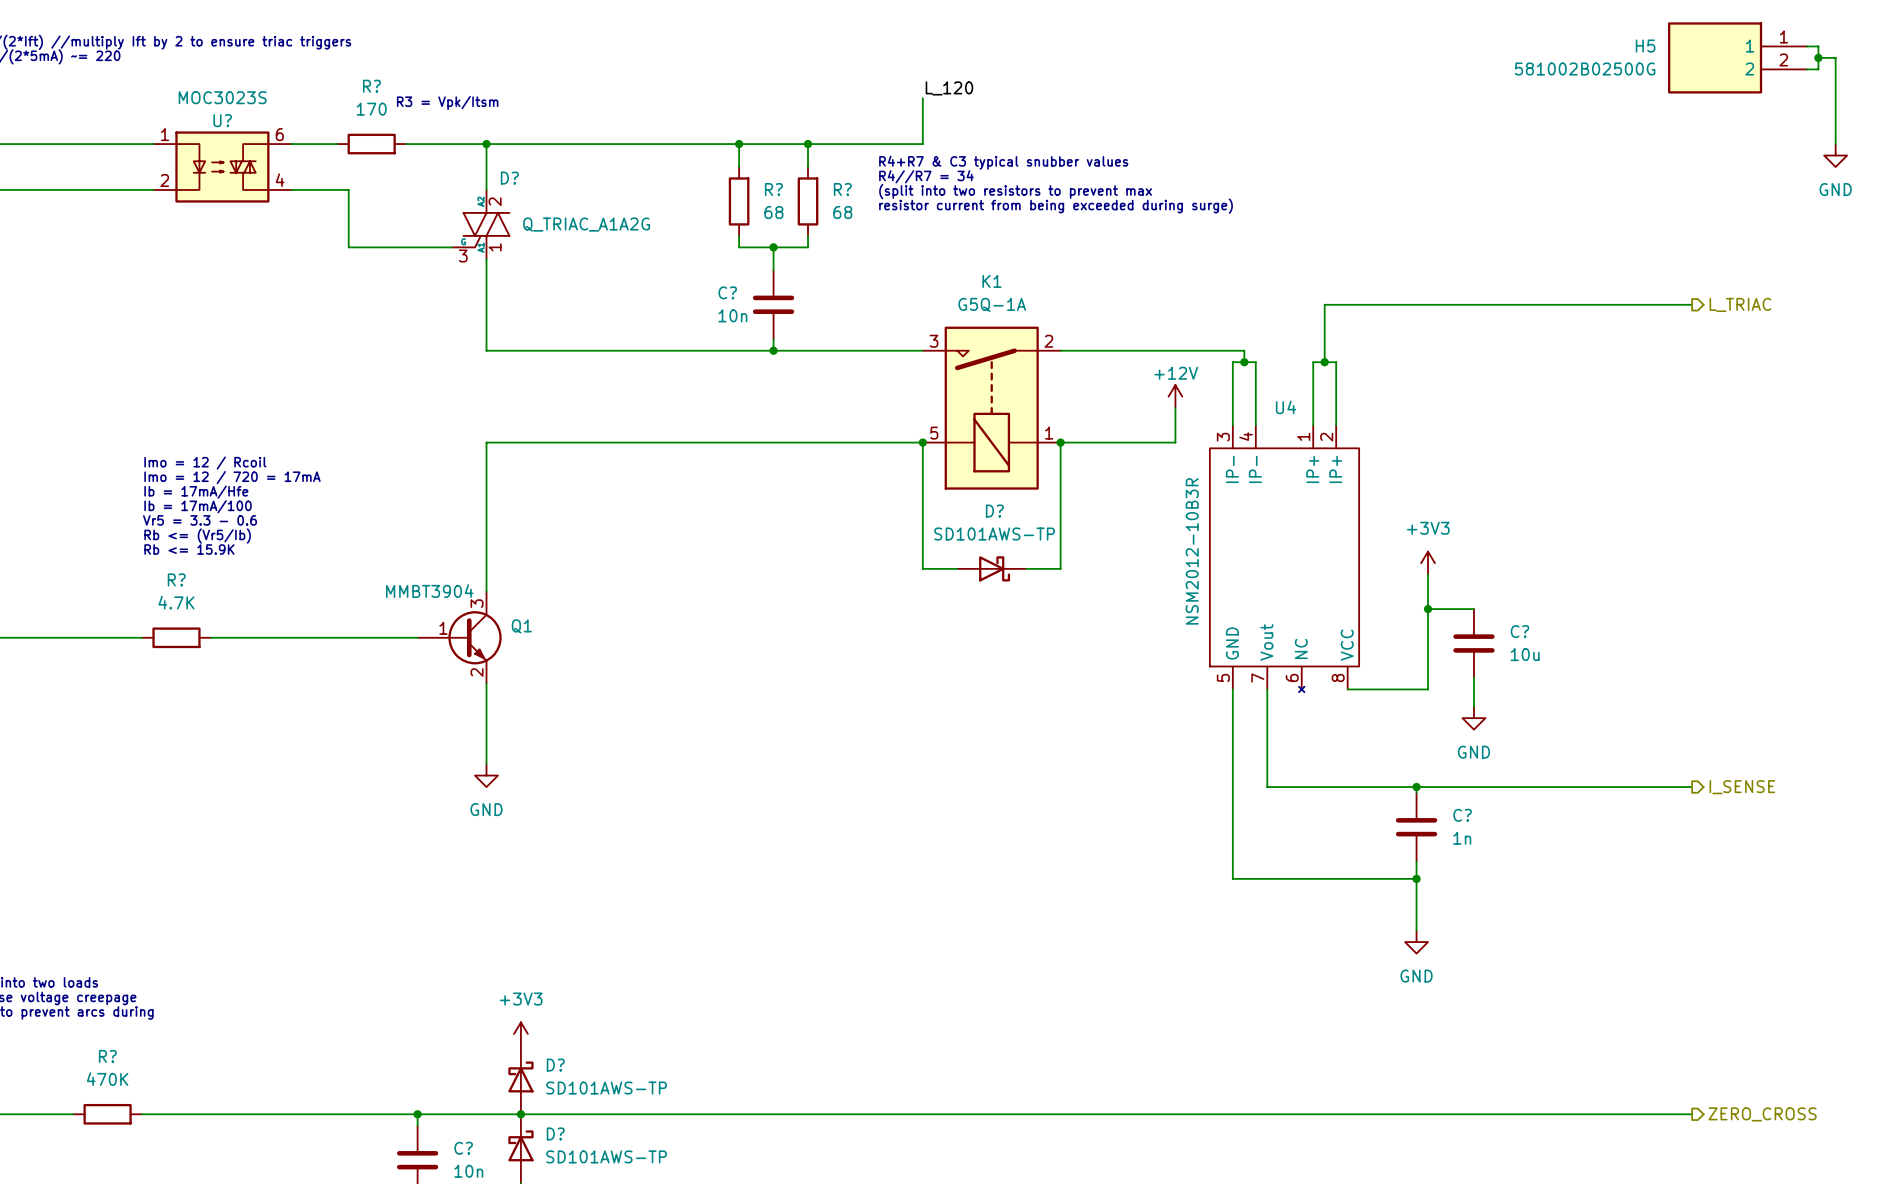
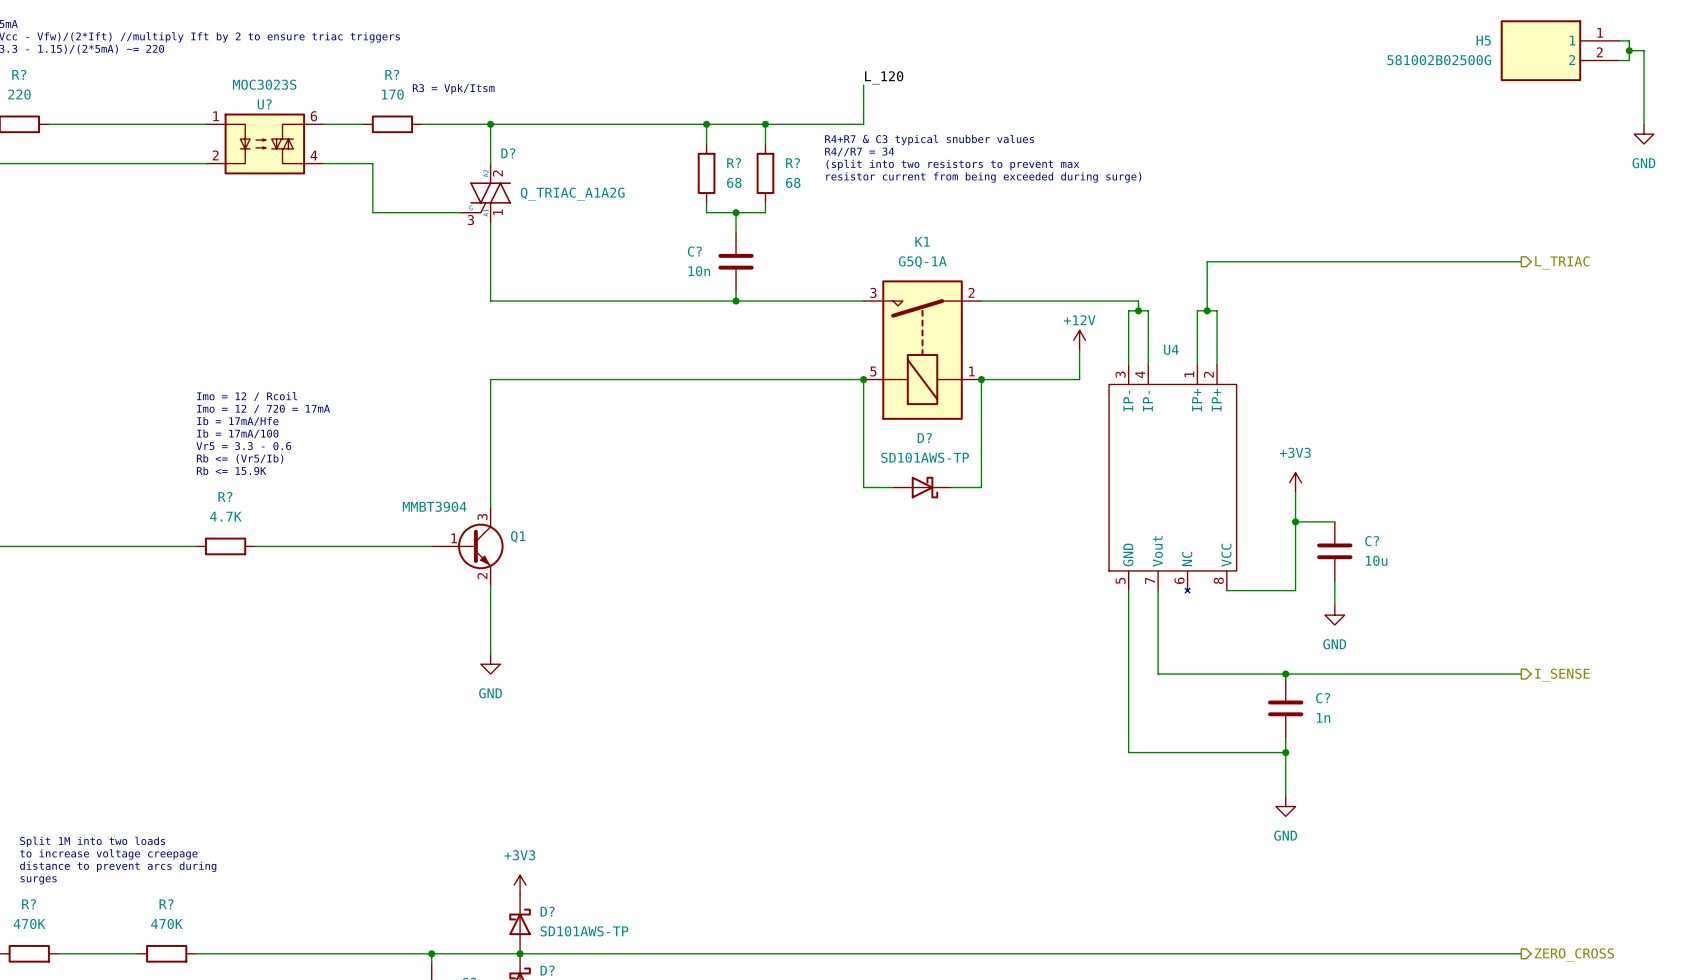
U4 value: NSM2012-10B3R (1192, 551) -> none

